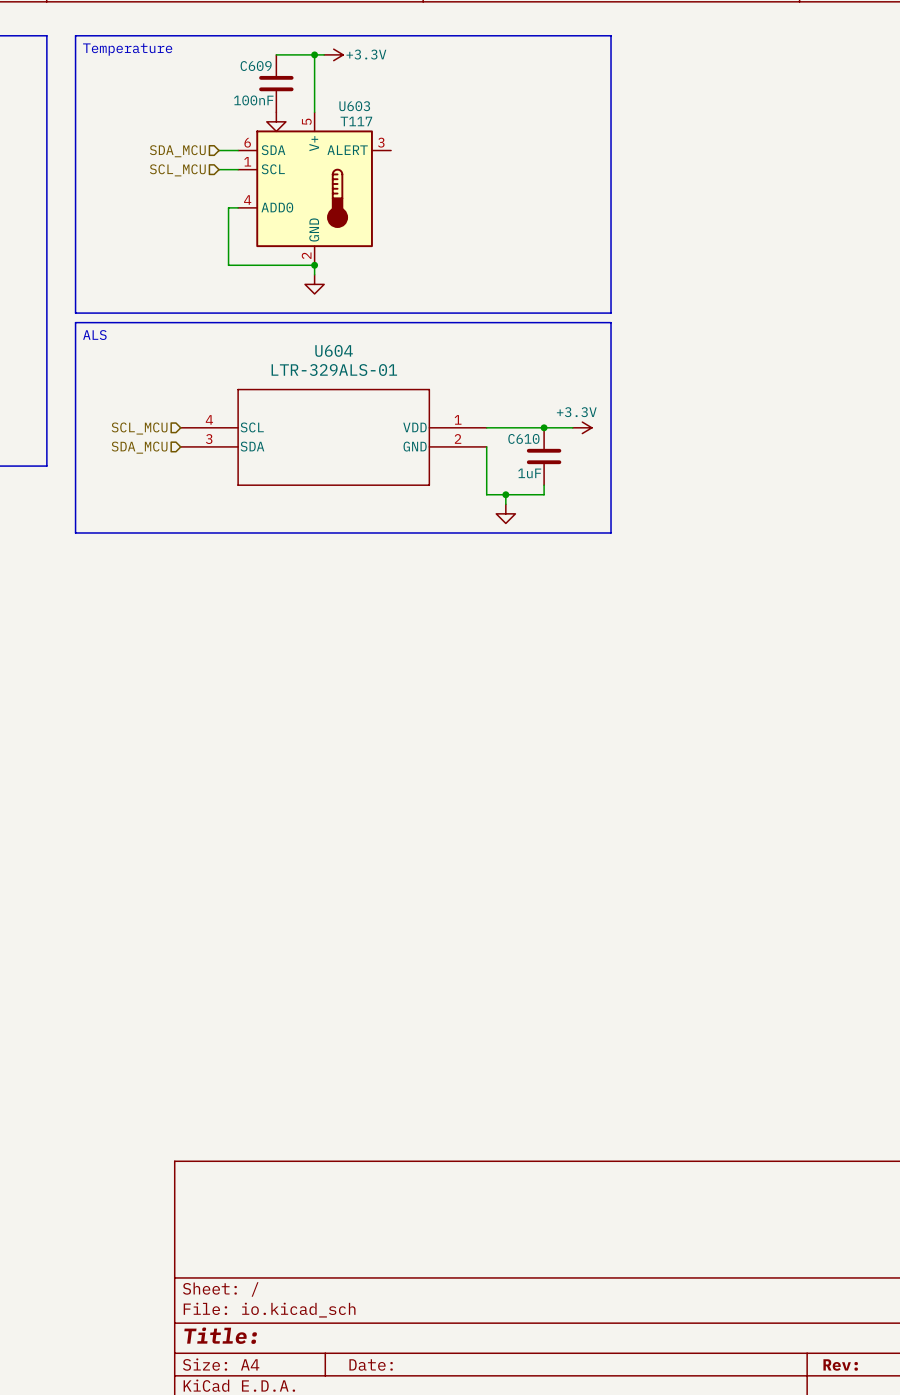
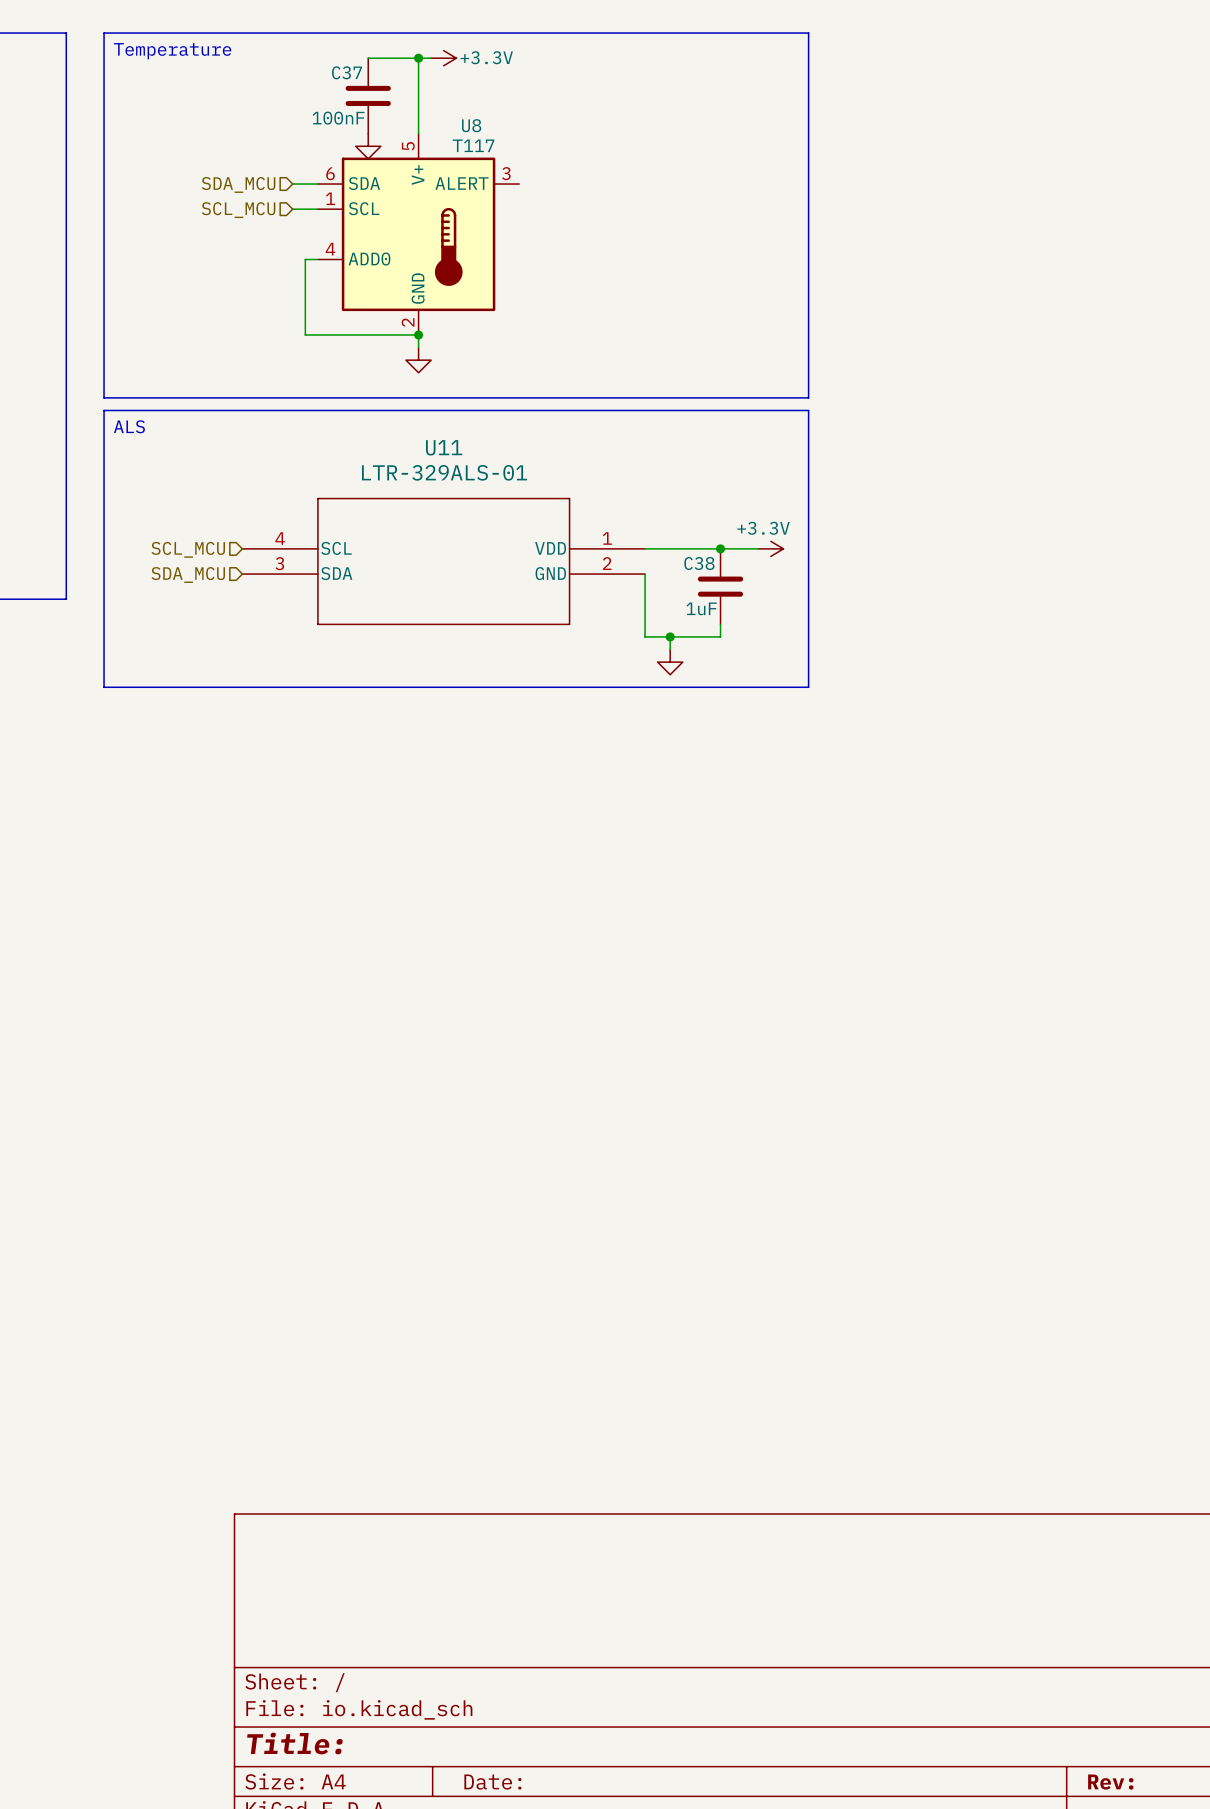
C609 name: C609 (256, 66) -> C37 (346, 72)
U603 name: U603 (354, 106) -> U8 (471, 125)
U604 name: U604 (334, 350) -> U11 (444, 447)
C610 name: C610 (523, 438) -> C38 (699, 563)

